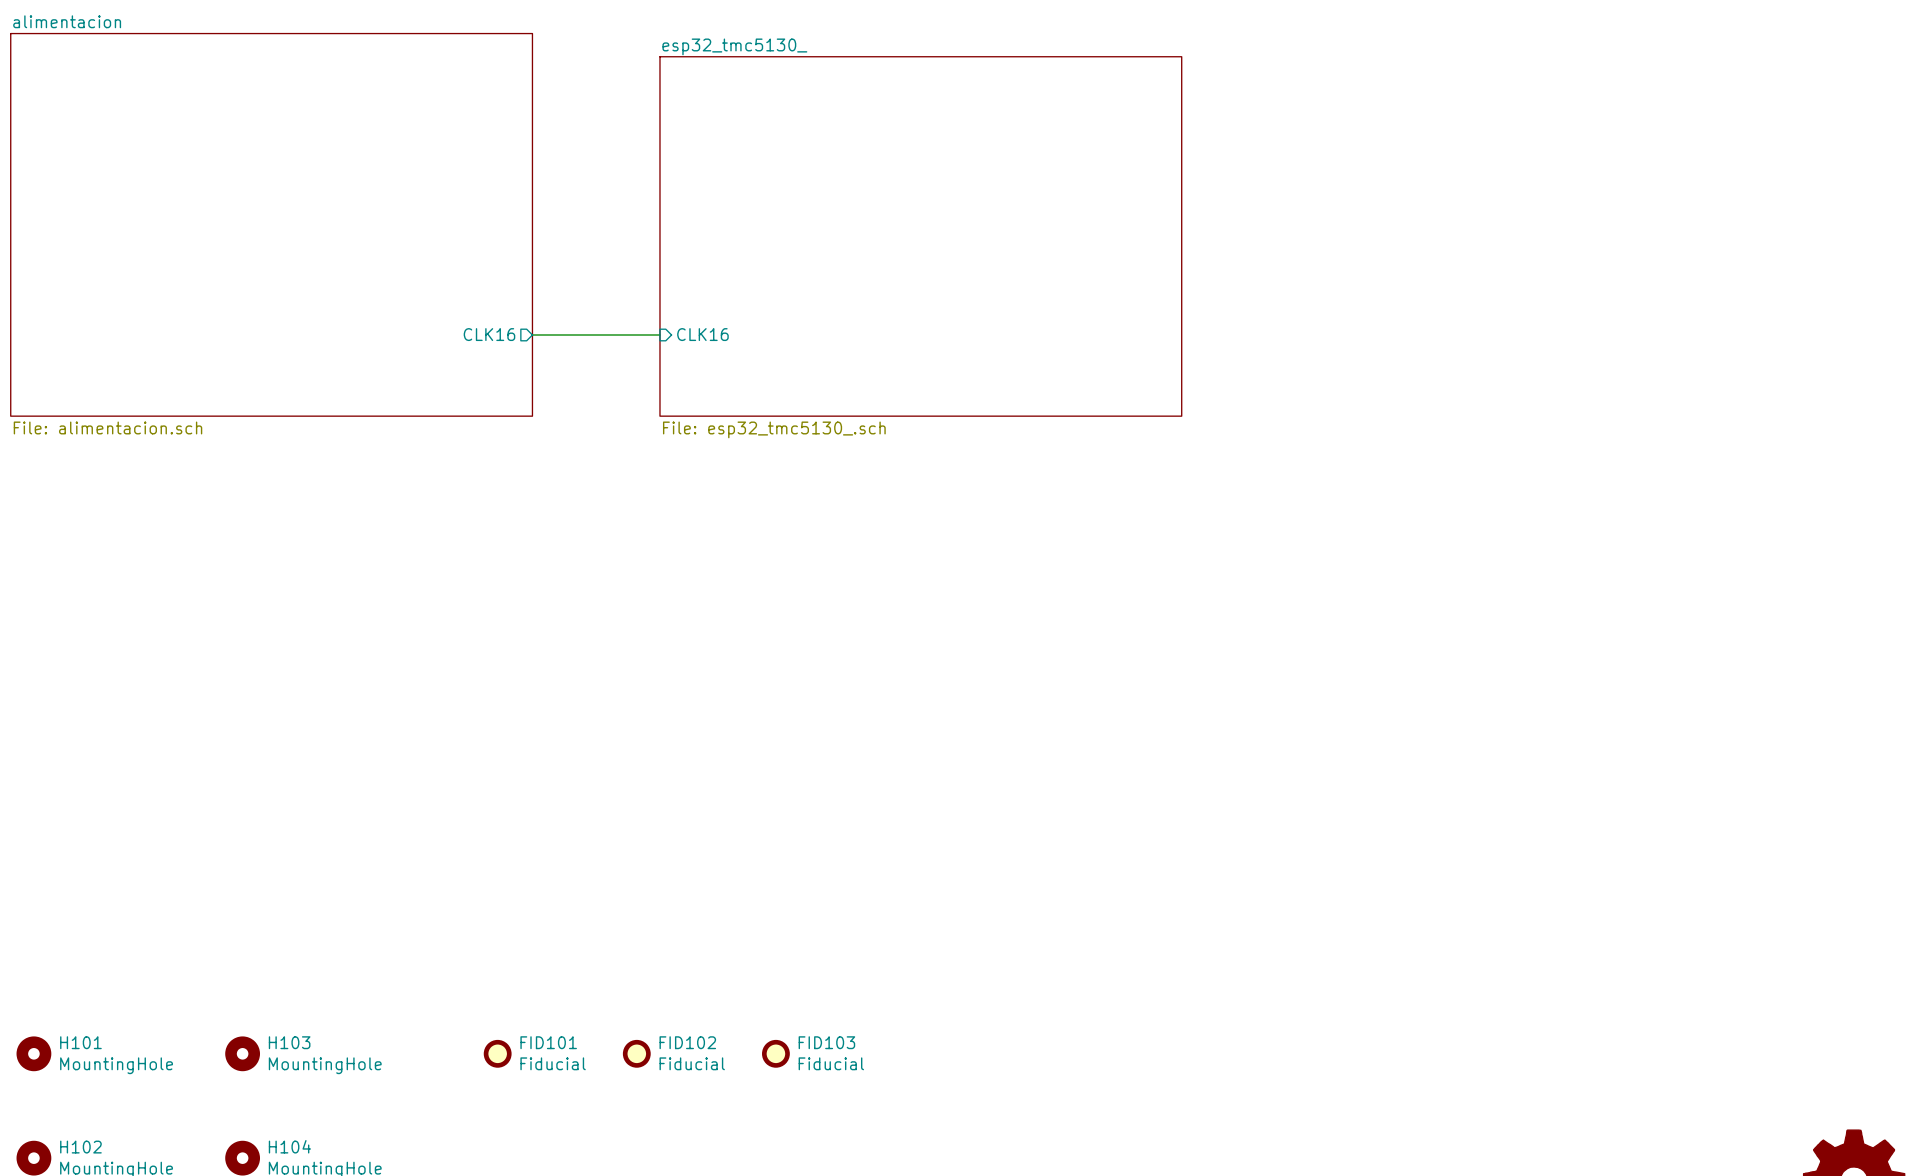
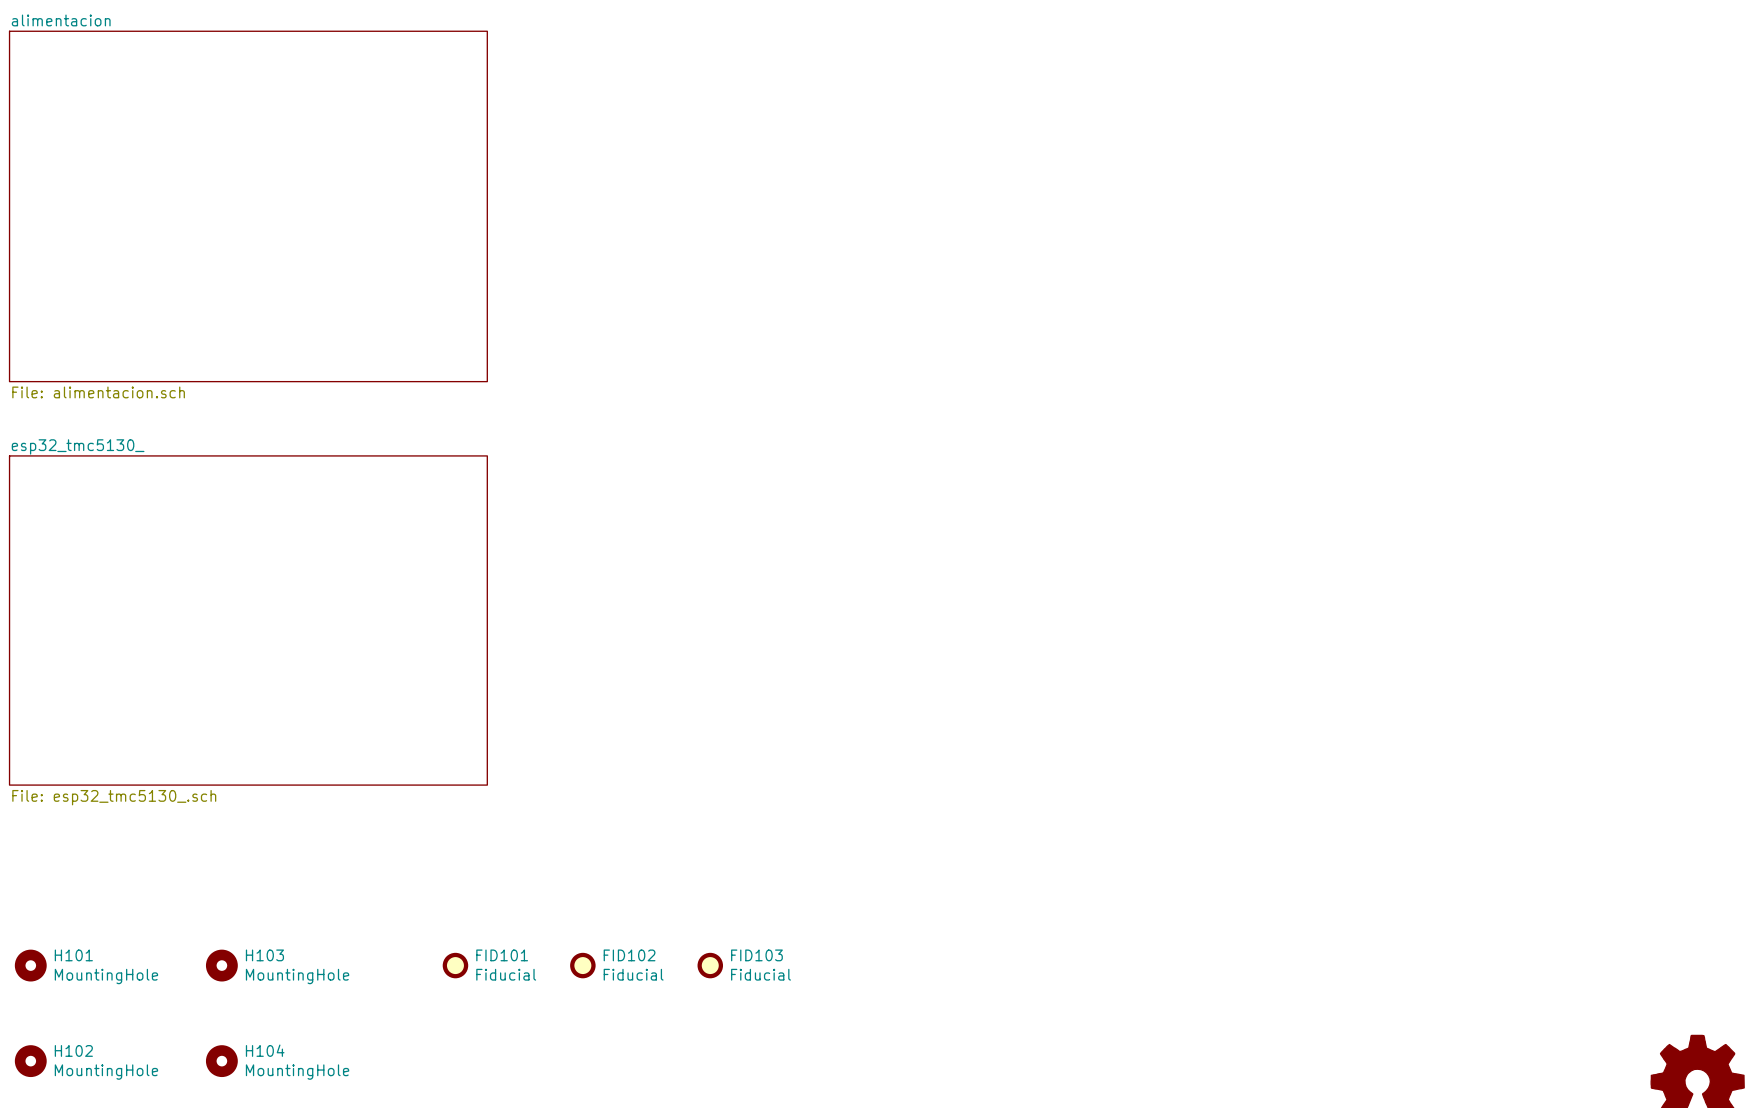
sheet esp32_tmc5130_ position: (920, 236) -> (248, 620)
sheet pin: CLK16 (489, 334) -> none
sheet pin: CLK16 (702, 334) -> none
wire: (532, 335) (659, 335) -> none

